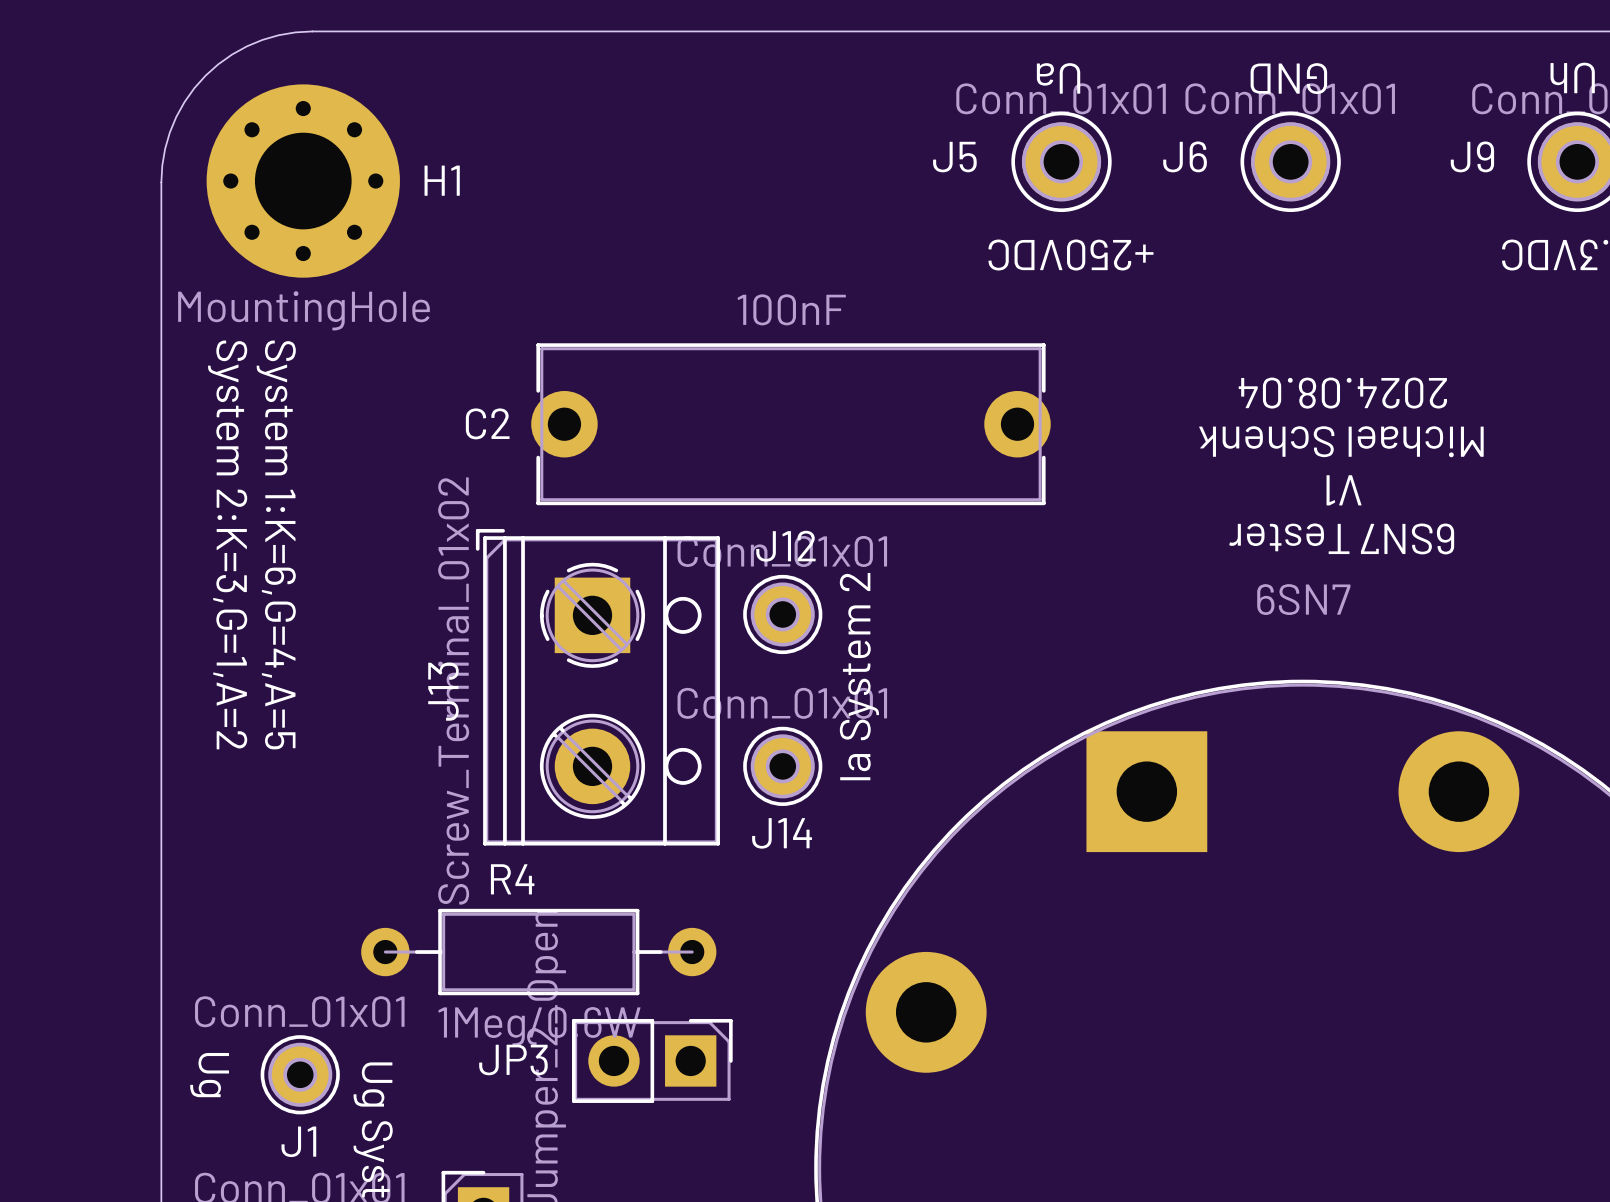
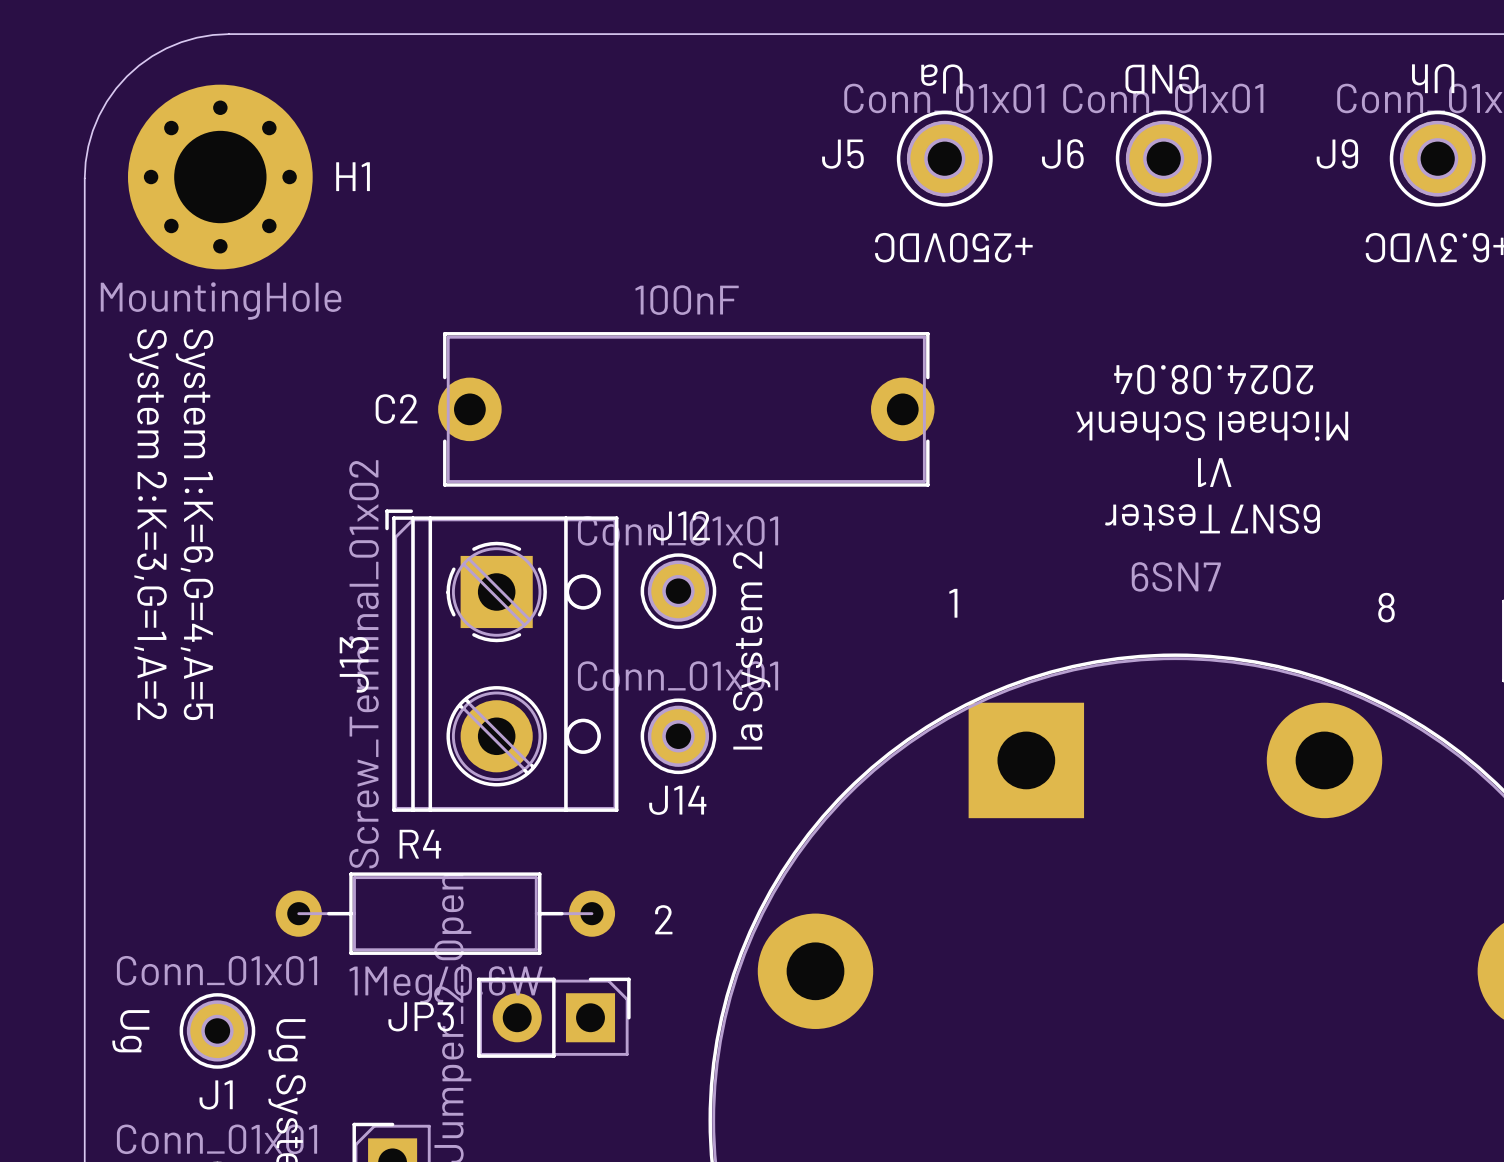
text: none -> 1 (953, 603)
text: none -> 8 (1386, 607)
text: none -> 2 (663, 919)

